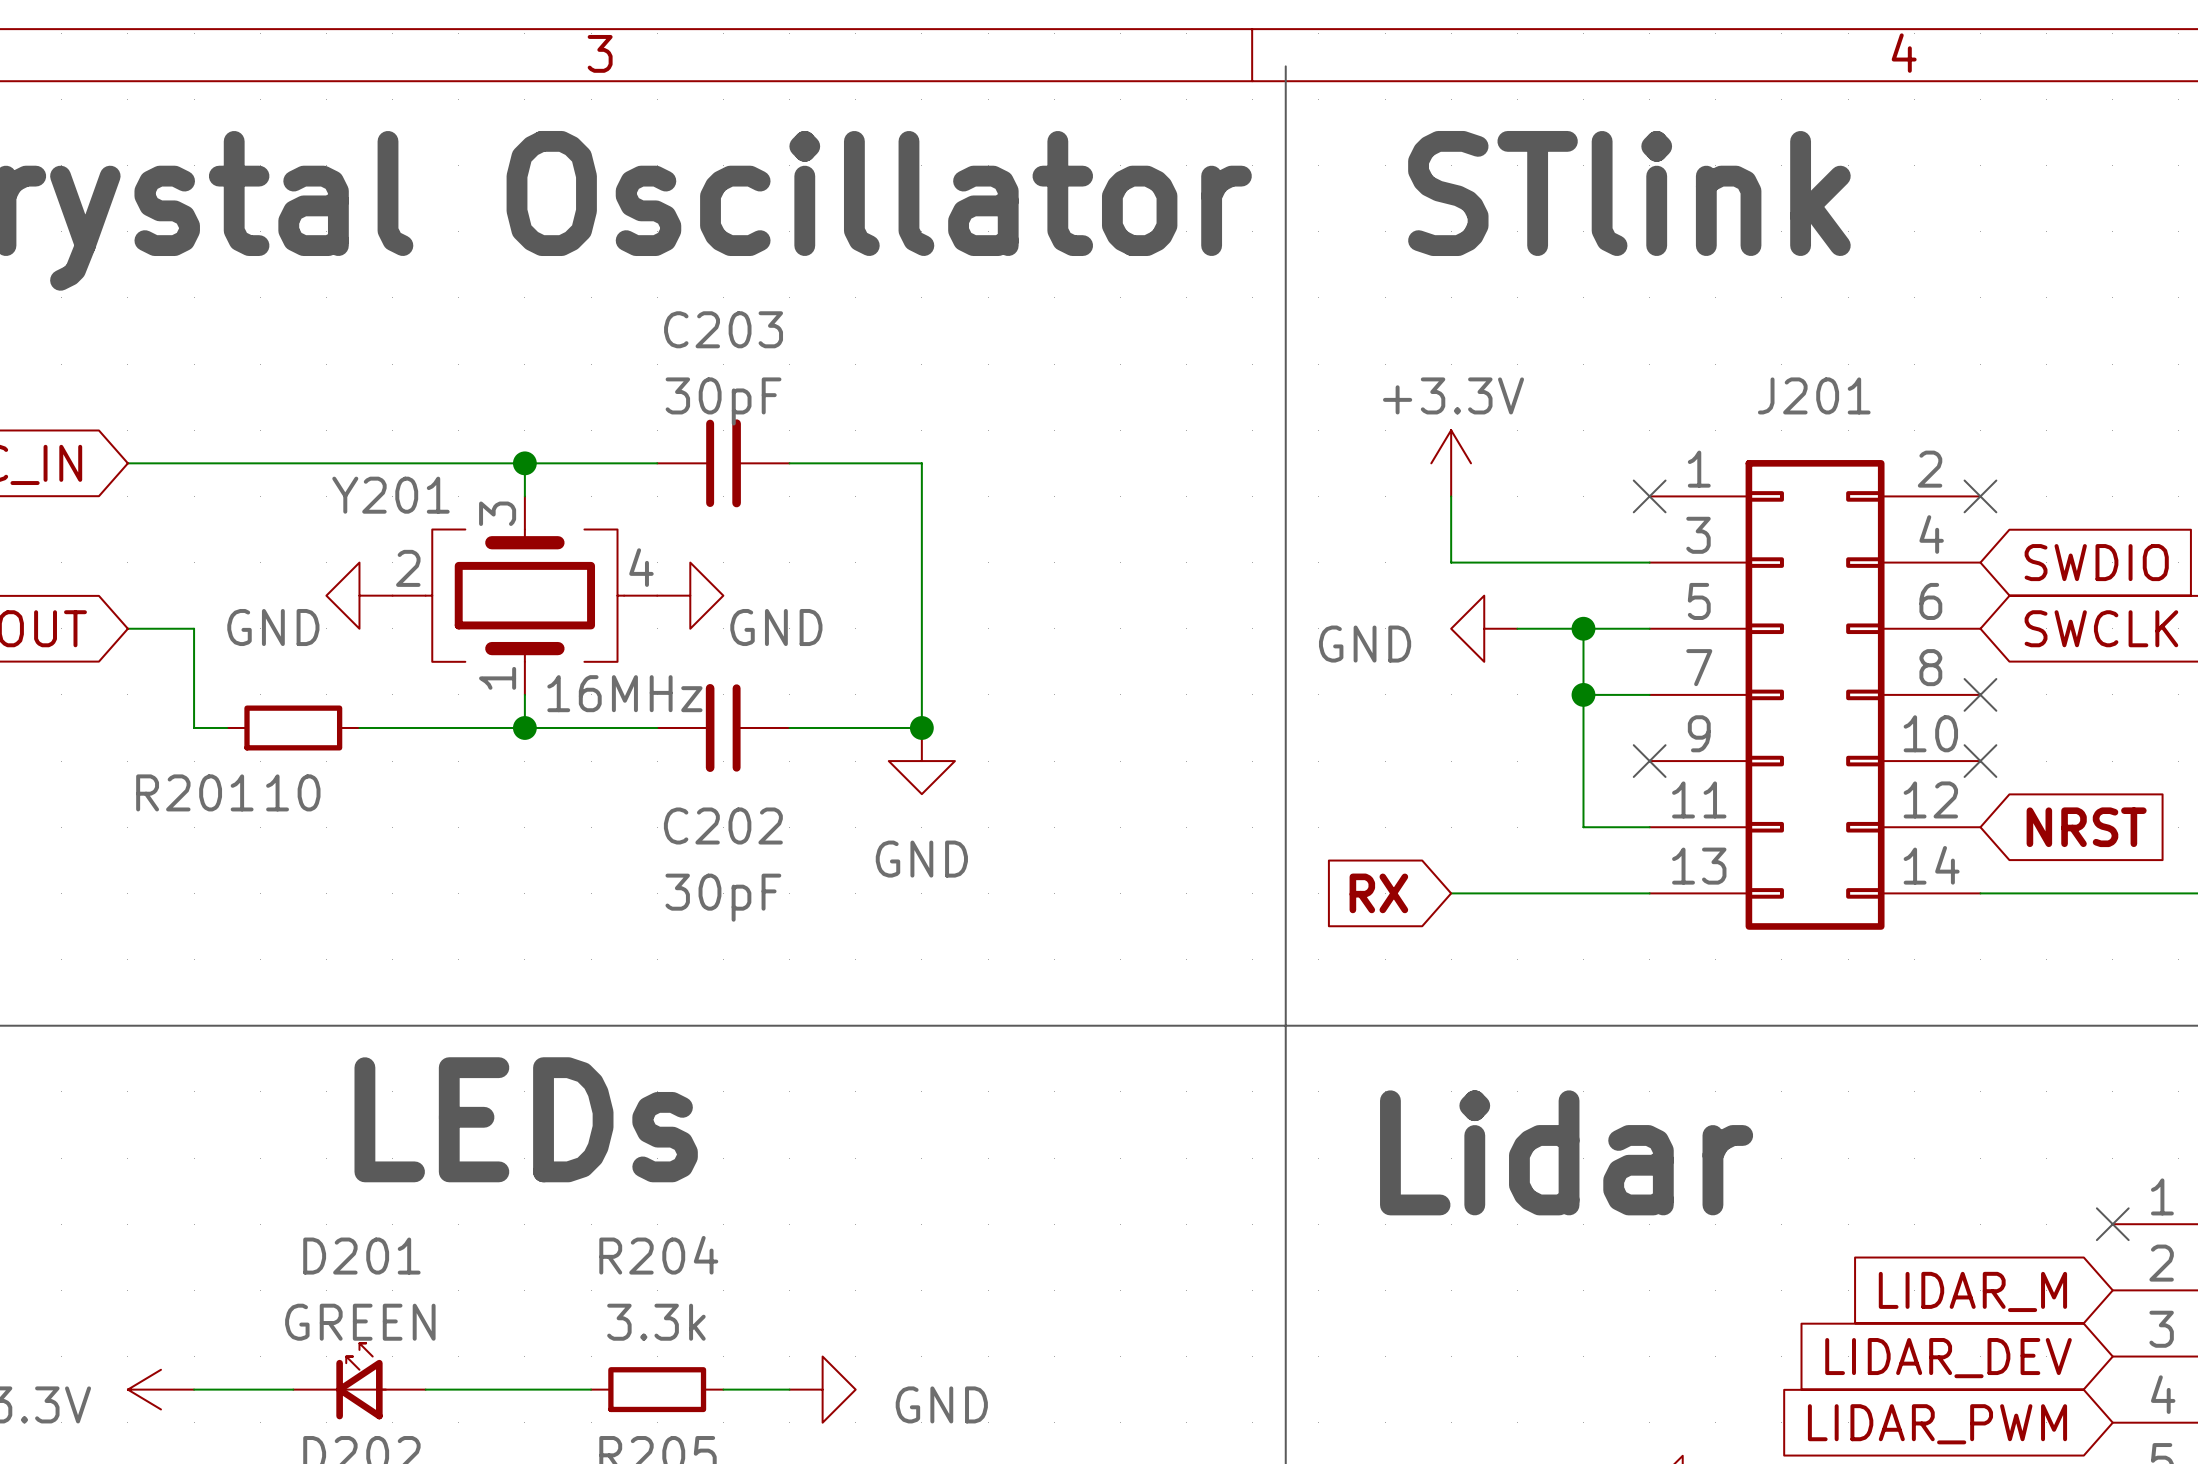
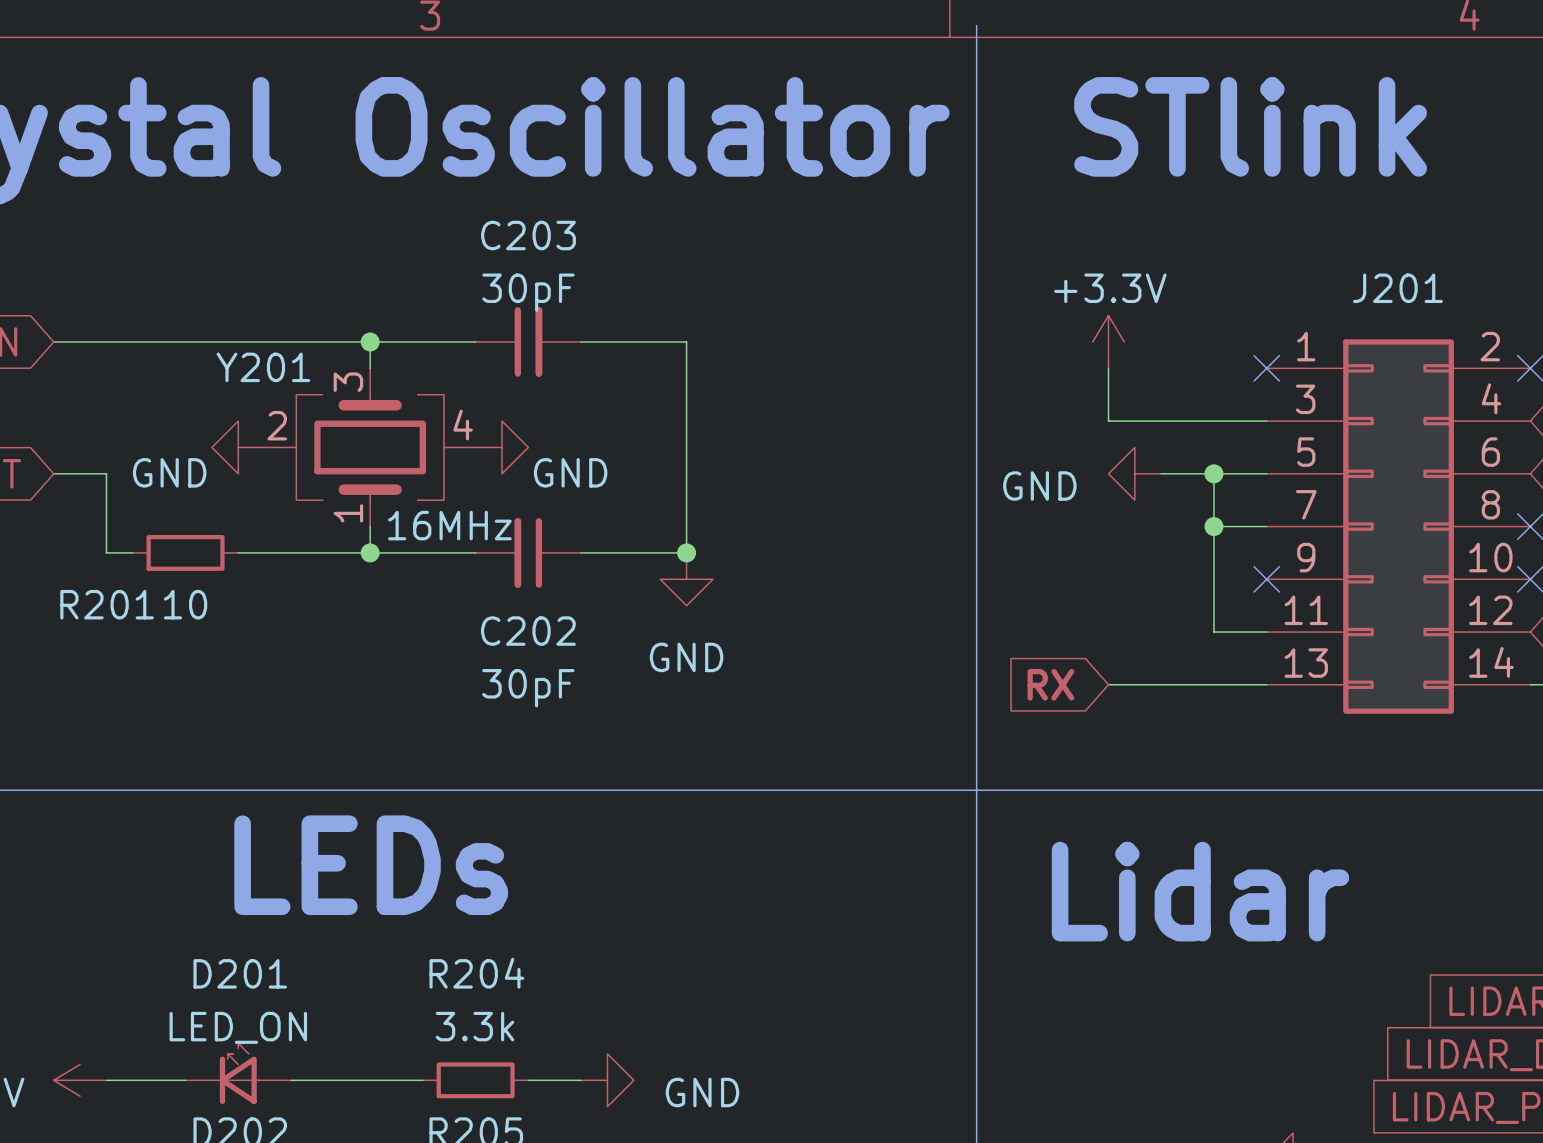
D201 value: GREEN (360, 1322) -> LED_ON (238, 1027)

